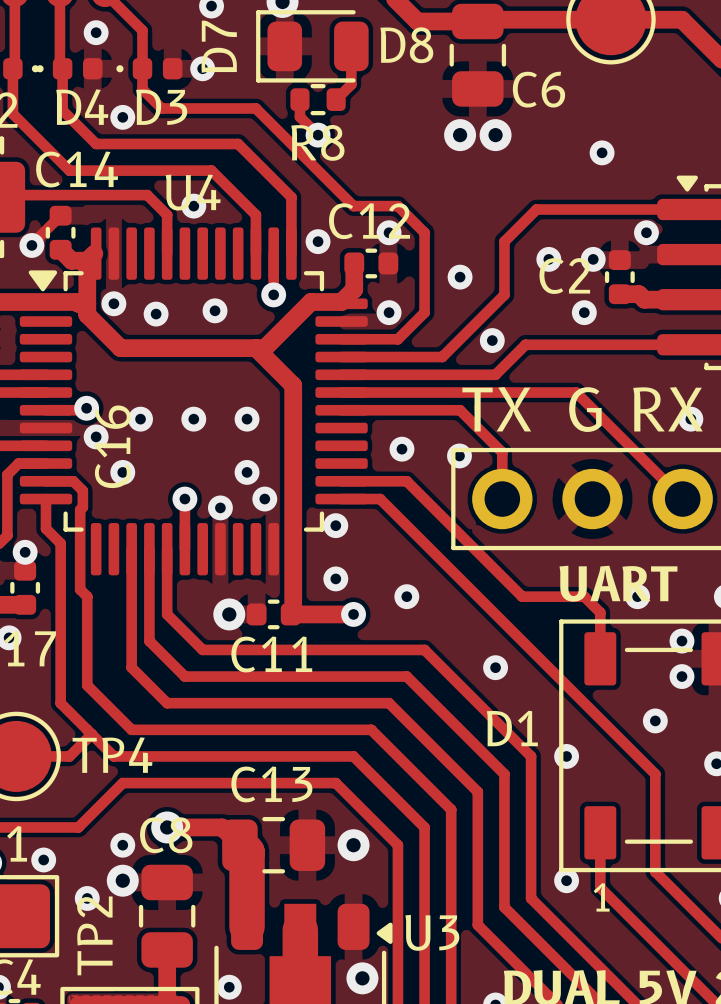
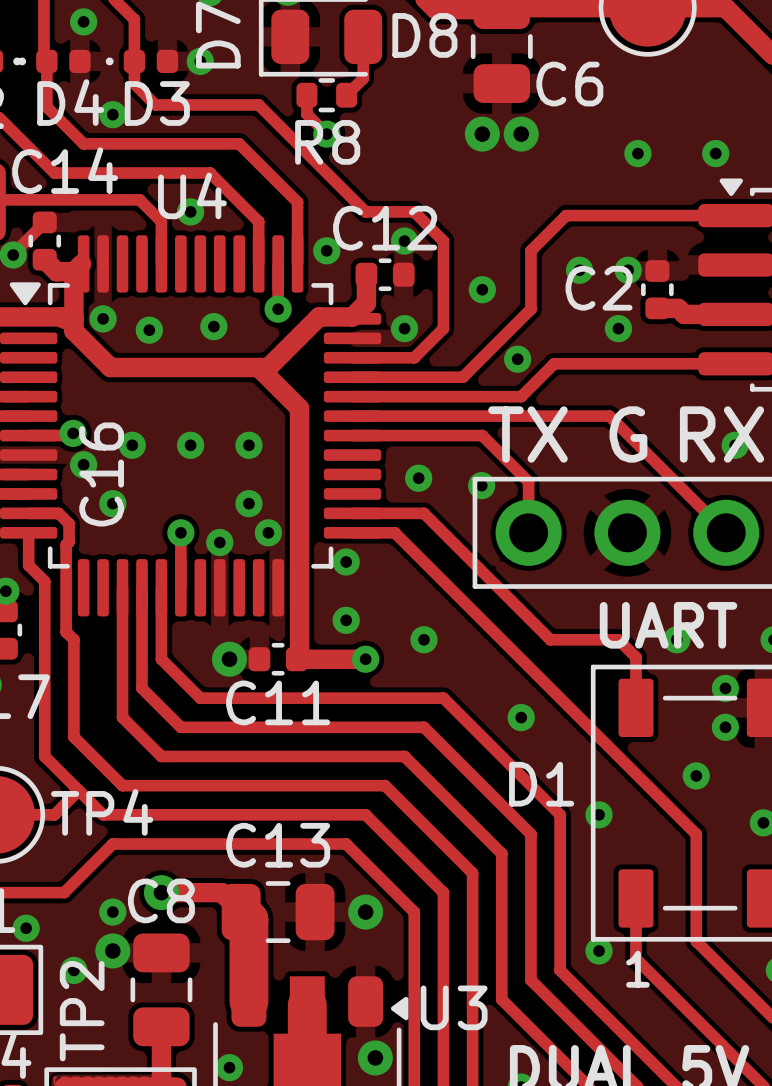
via: none -> (715, 153)
via: (646, 232) -> none

